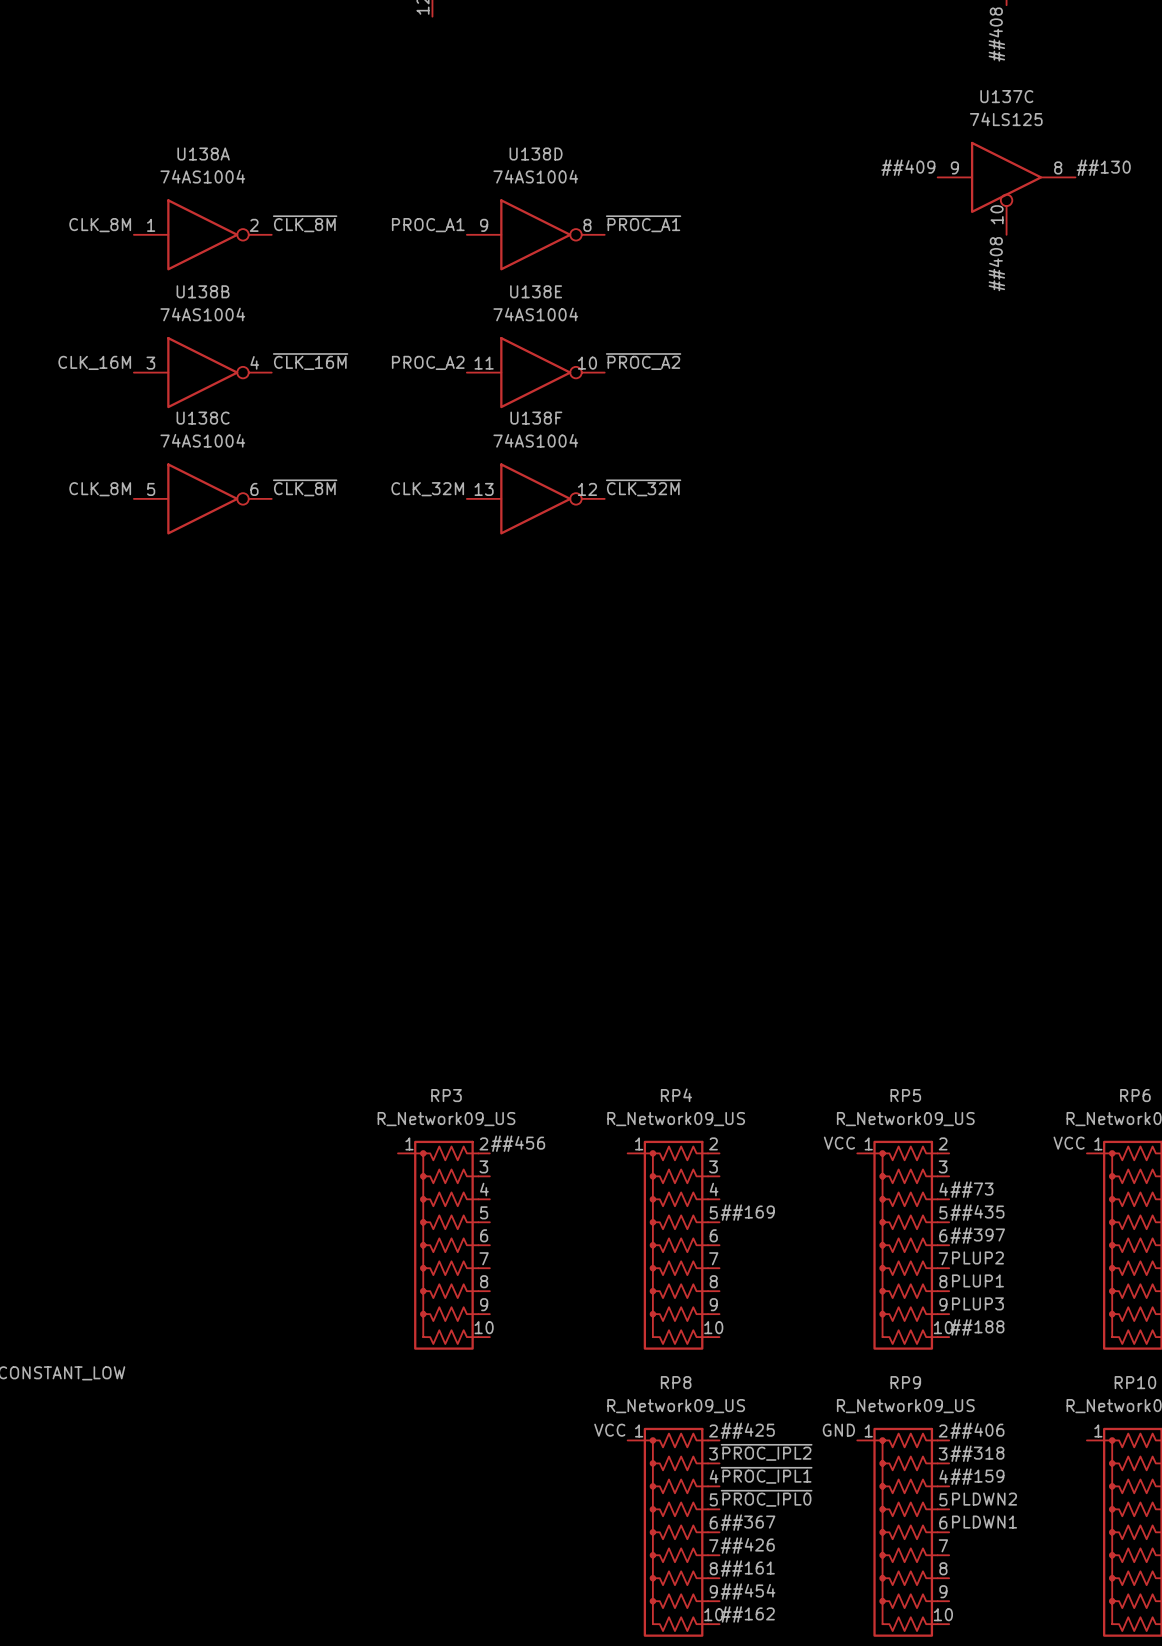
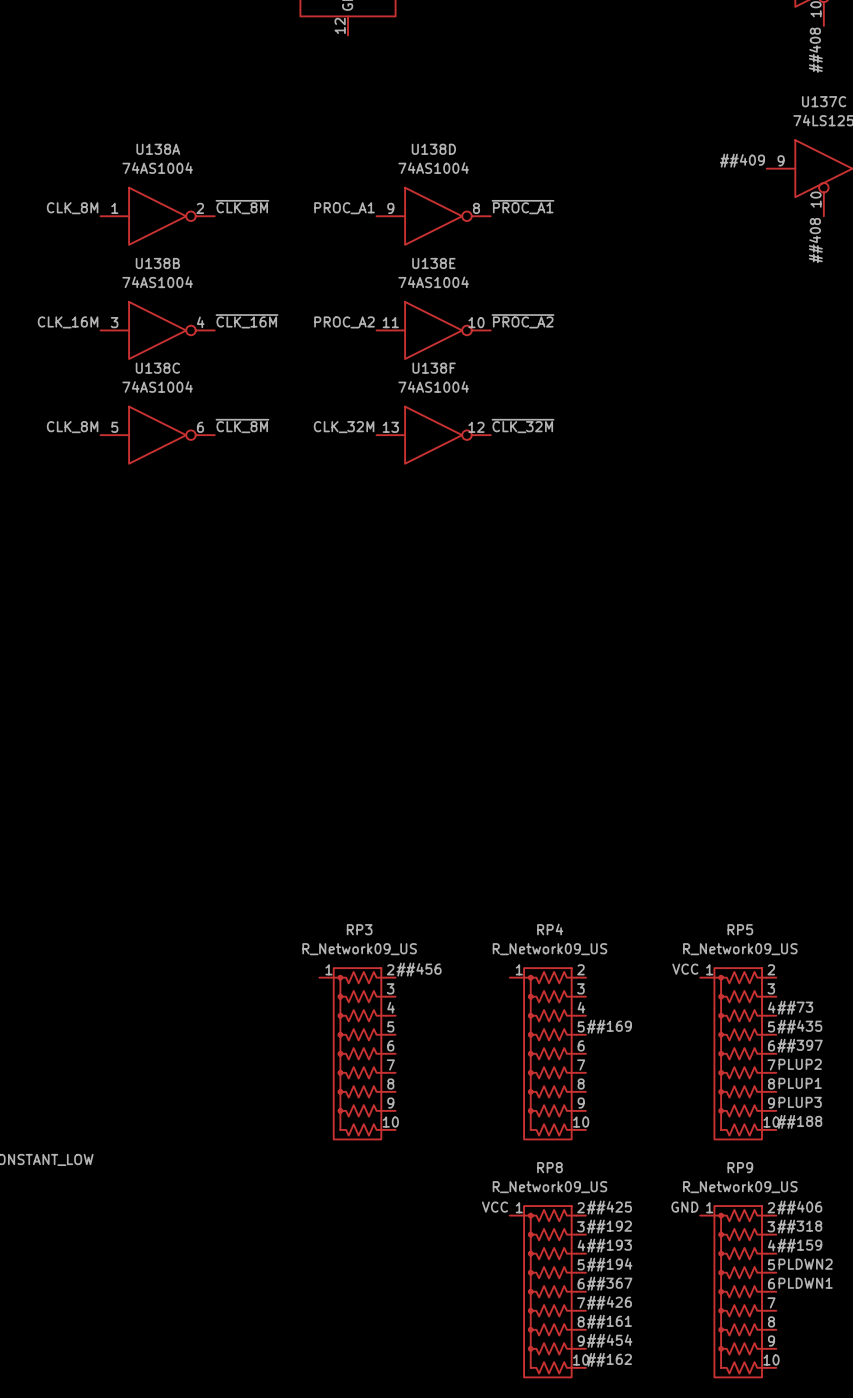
label: ~{PROC_IPL2} (766, 1452) -> ##192 (609, 1226)
label: ~{PROC_IPL1} (766, 1475) -> ##193 (609, 1245)
label: ~{PROC_IPL0} (766, 1498) -> ##194 (609, 1264)

